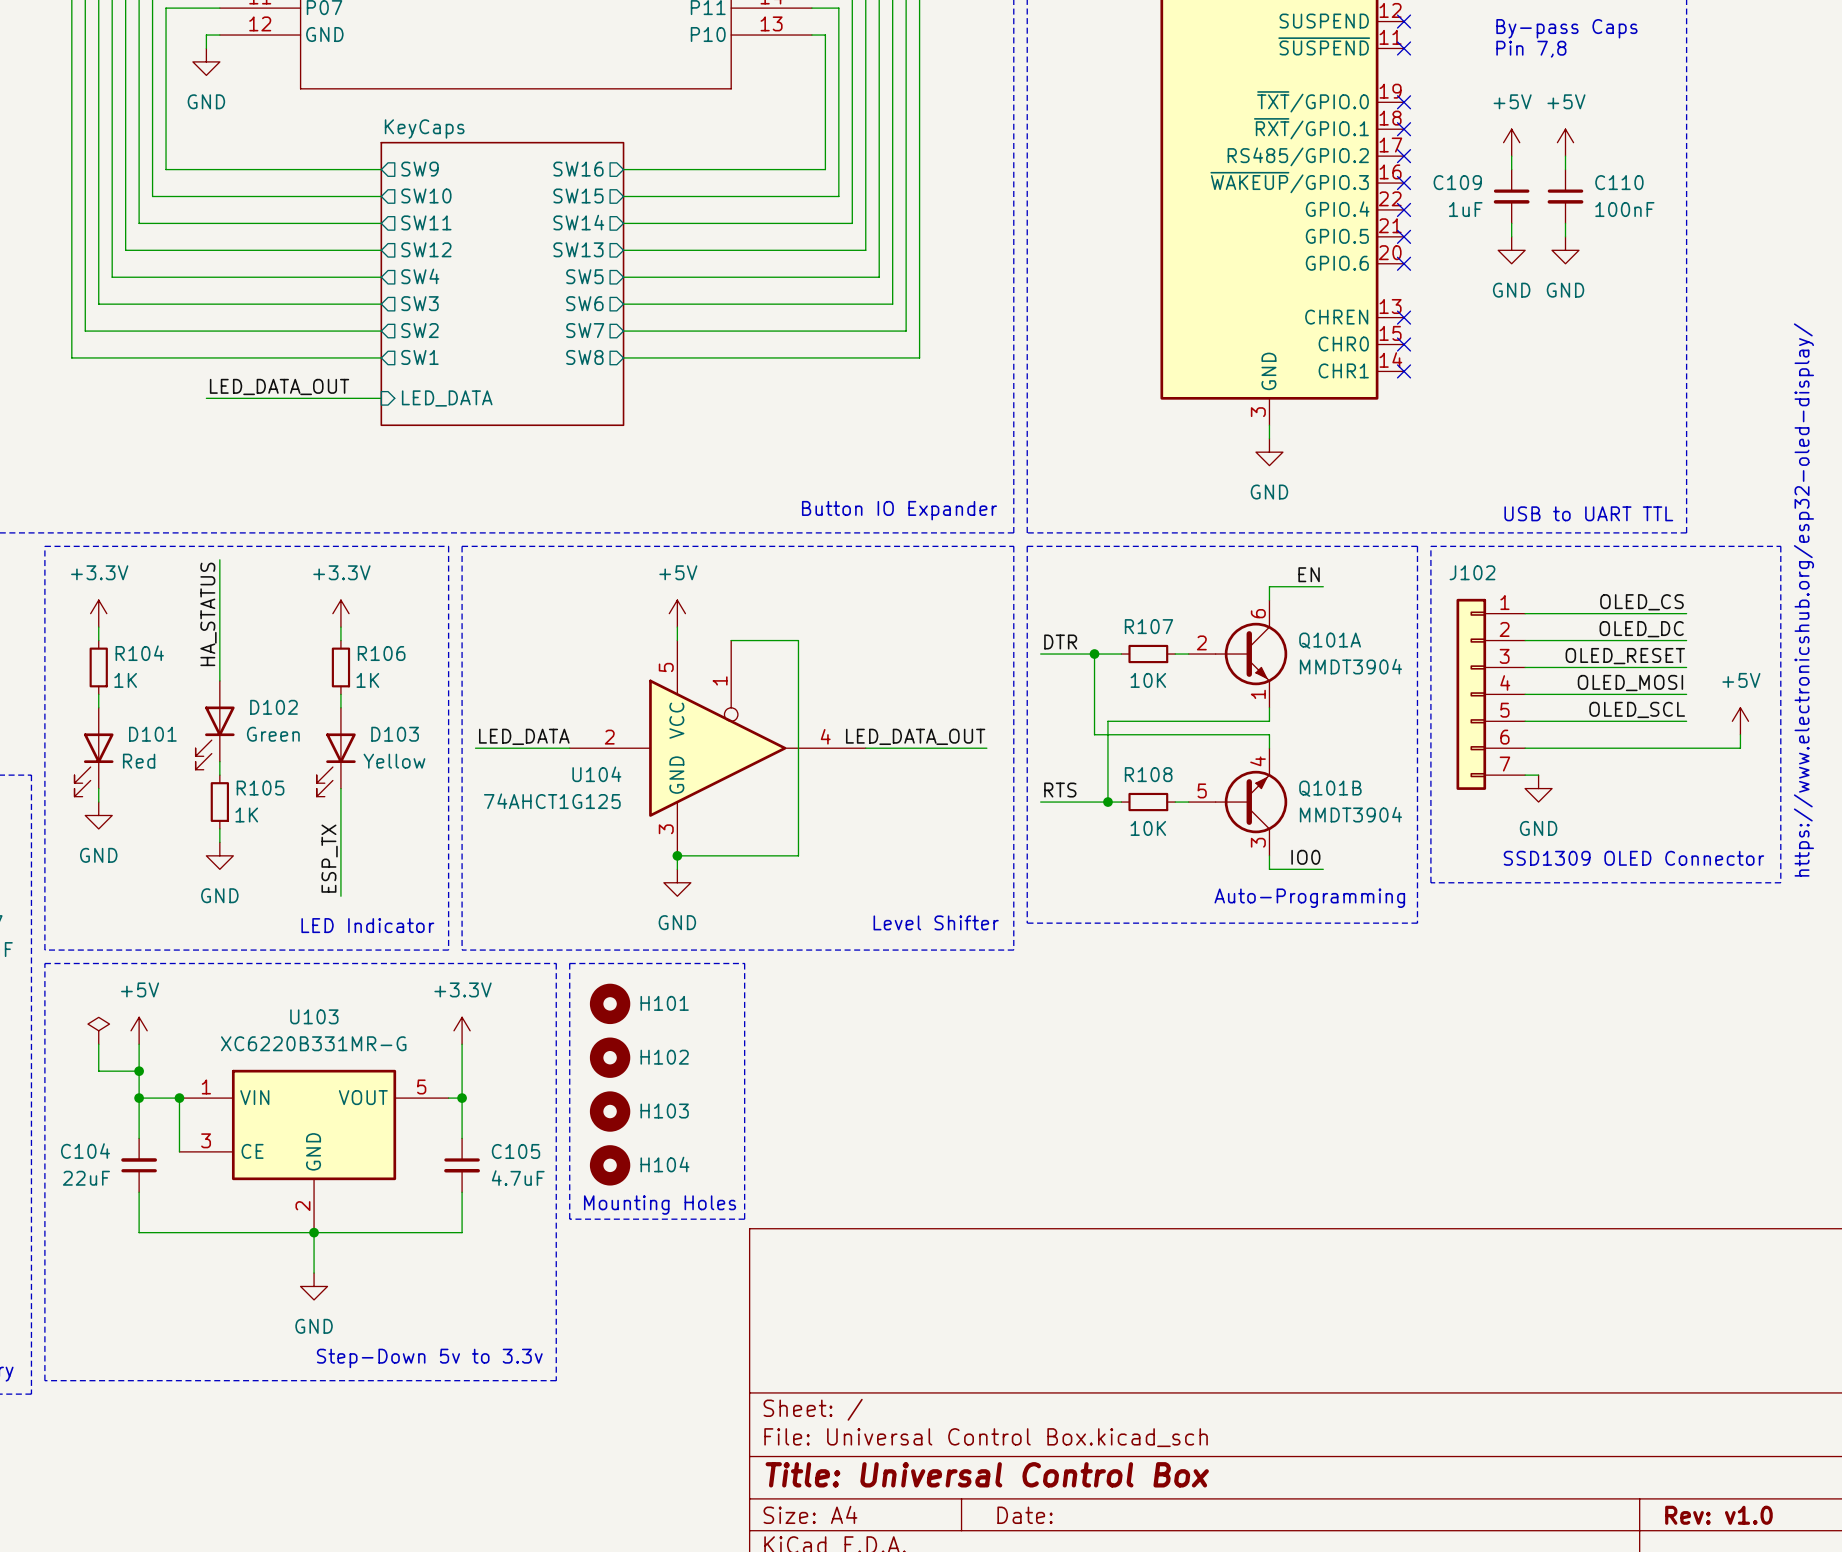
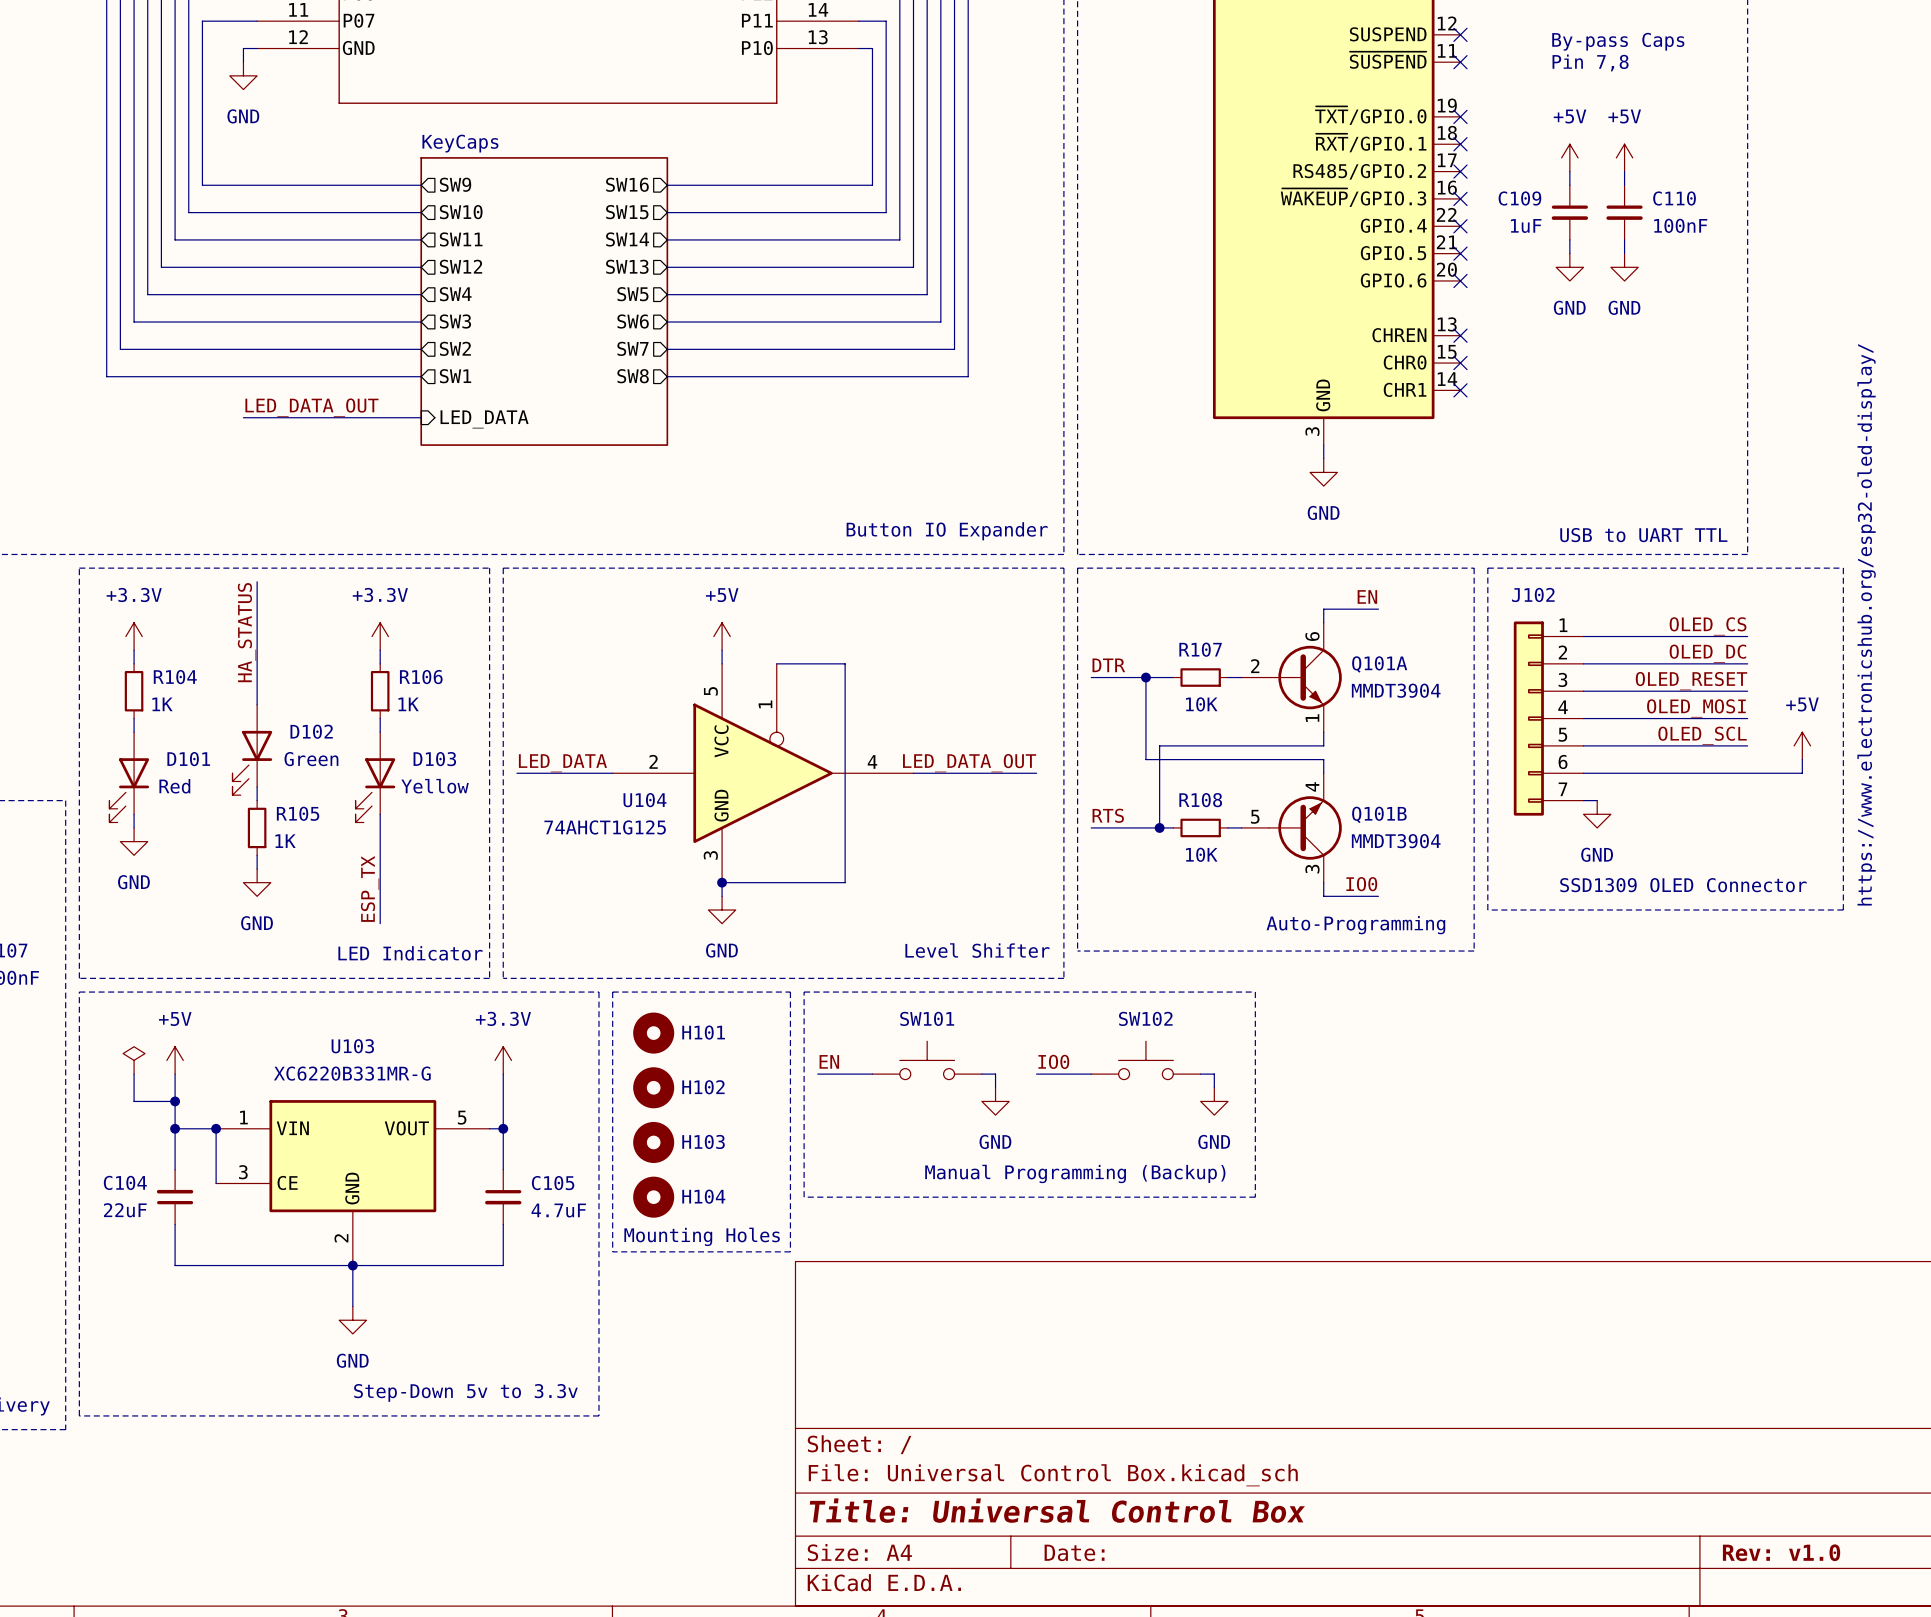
line: none -> (804, 992) (1255, 992) (1255, 1197) (804, 1197) (804, 992)
SW101: none -> (927, 1060)
SW102: none -> (1145, 1060)
label: none -> EN (829, 1061)
label: none -> IO0 (1053, 1061)
wire: none -> (817, 1074) (872, 1074)
wire: none -> (981, 1074) (995, 1074) (995, 1087)
wire: none -> (1036, 1074) (1091, 1074)
wire: none -> (1200, 1074) (1214, 1074) (1214, 1087)
power symbol: none -> GND (995, 1101)
power symbol: none -> GND (1214, 1101)
text: none -> Manual Programming (Backup) (1075, 1173)

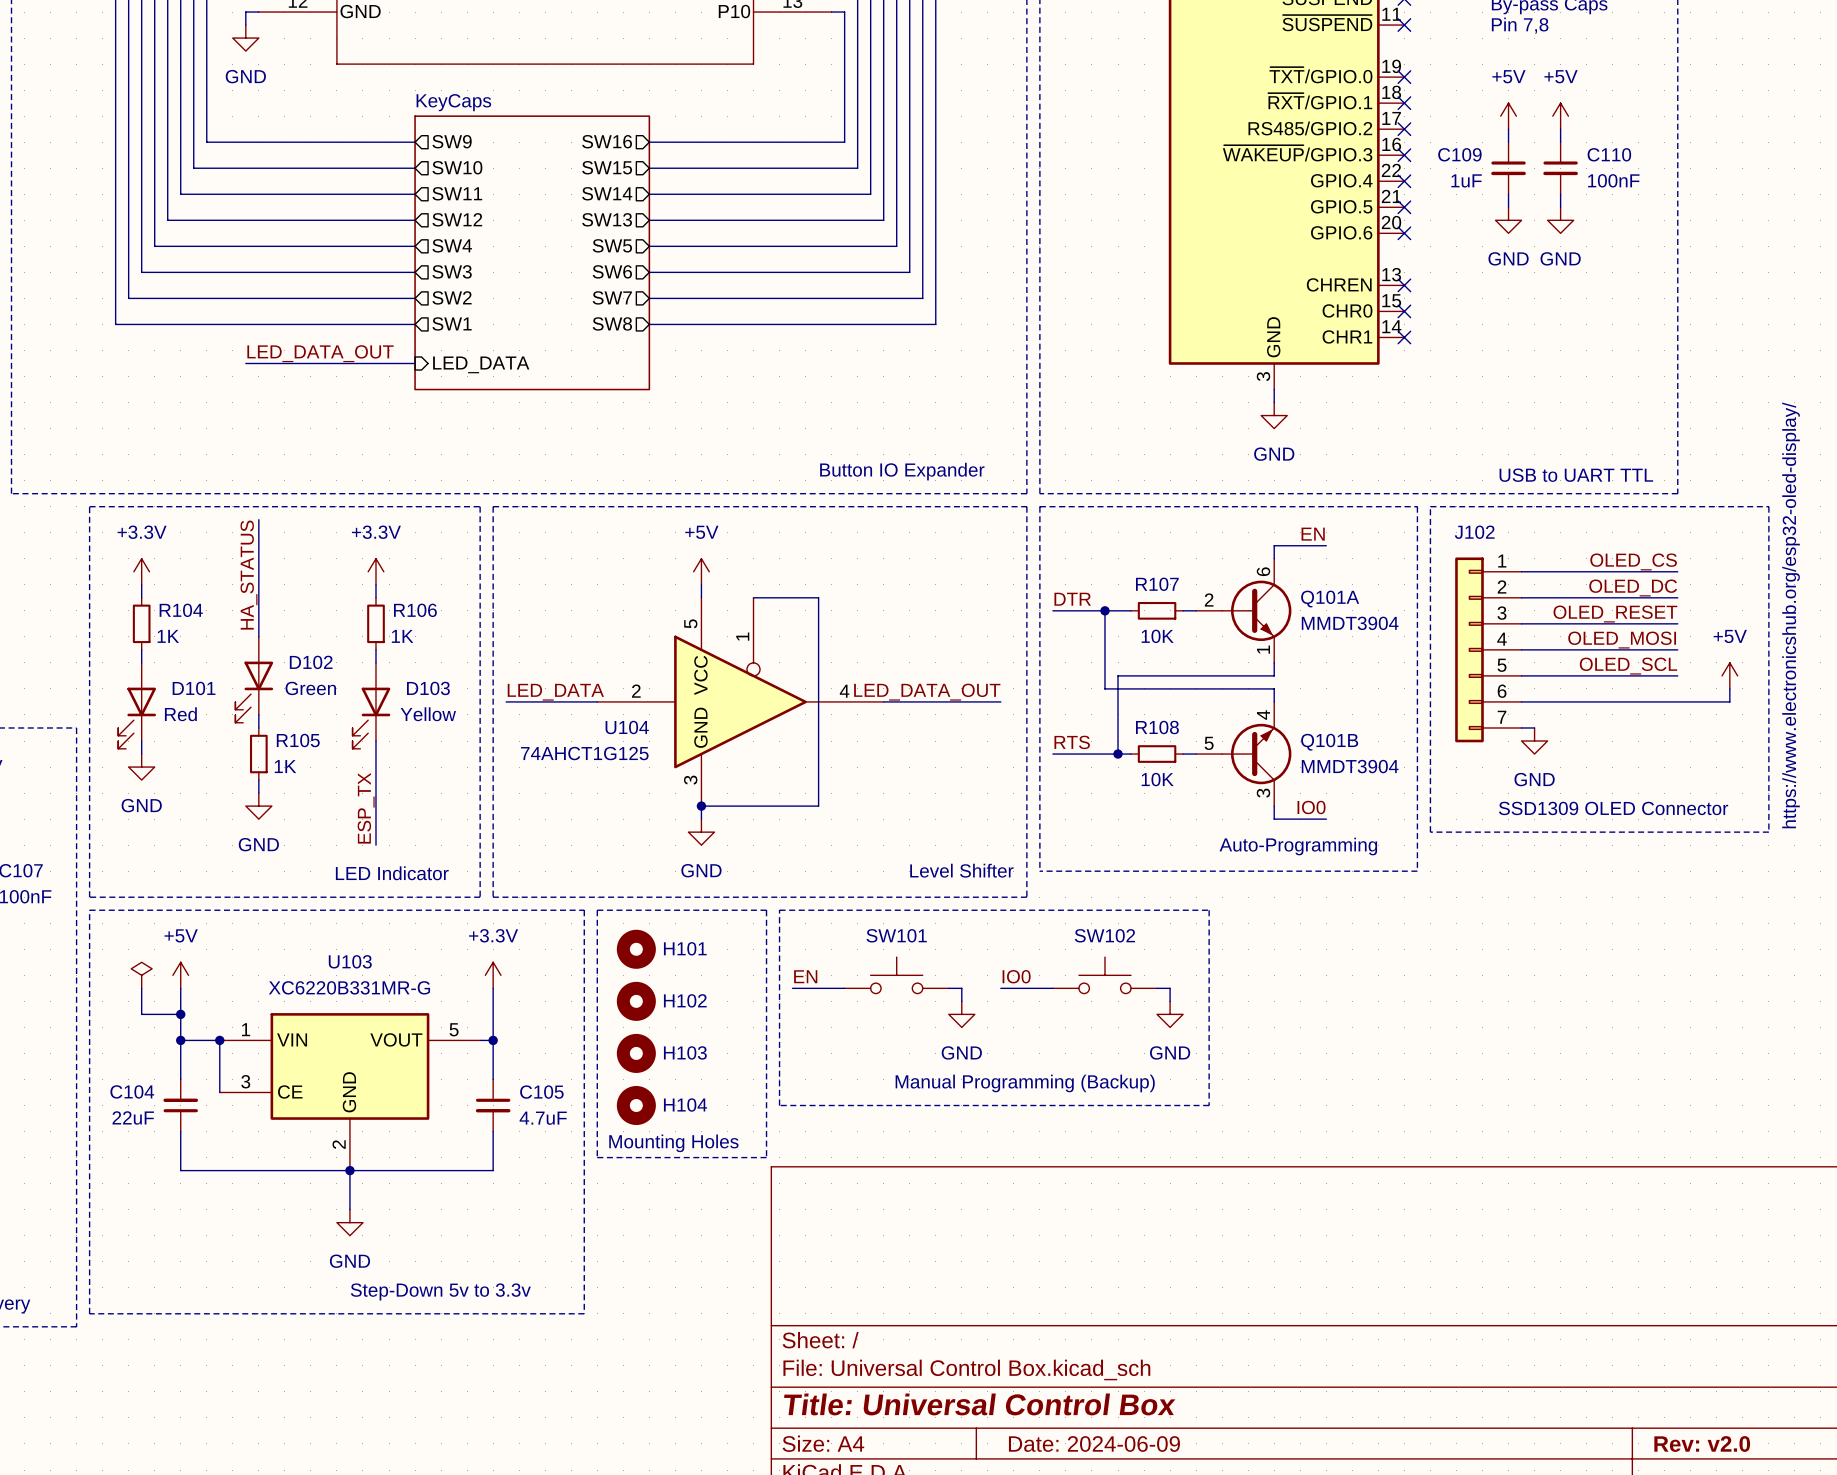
title block: Date: (1074, 1552) -> Date: 2024-06-09 (1094, 1444)
title block: Rev: v1.0 (1781, 1552) -> Rev: v2.0 (1702, 1444)

